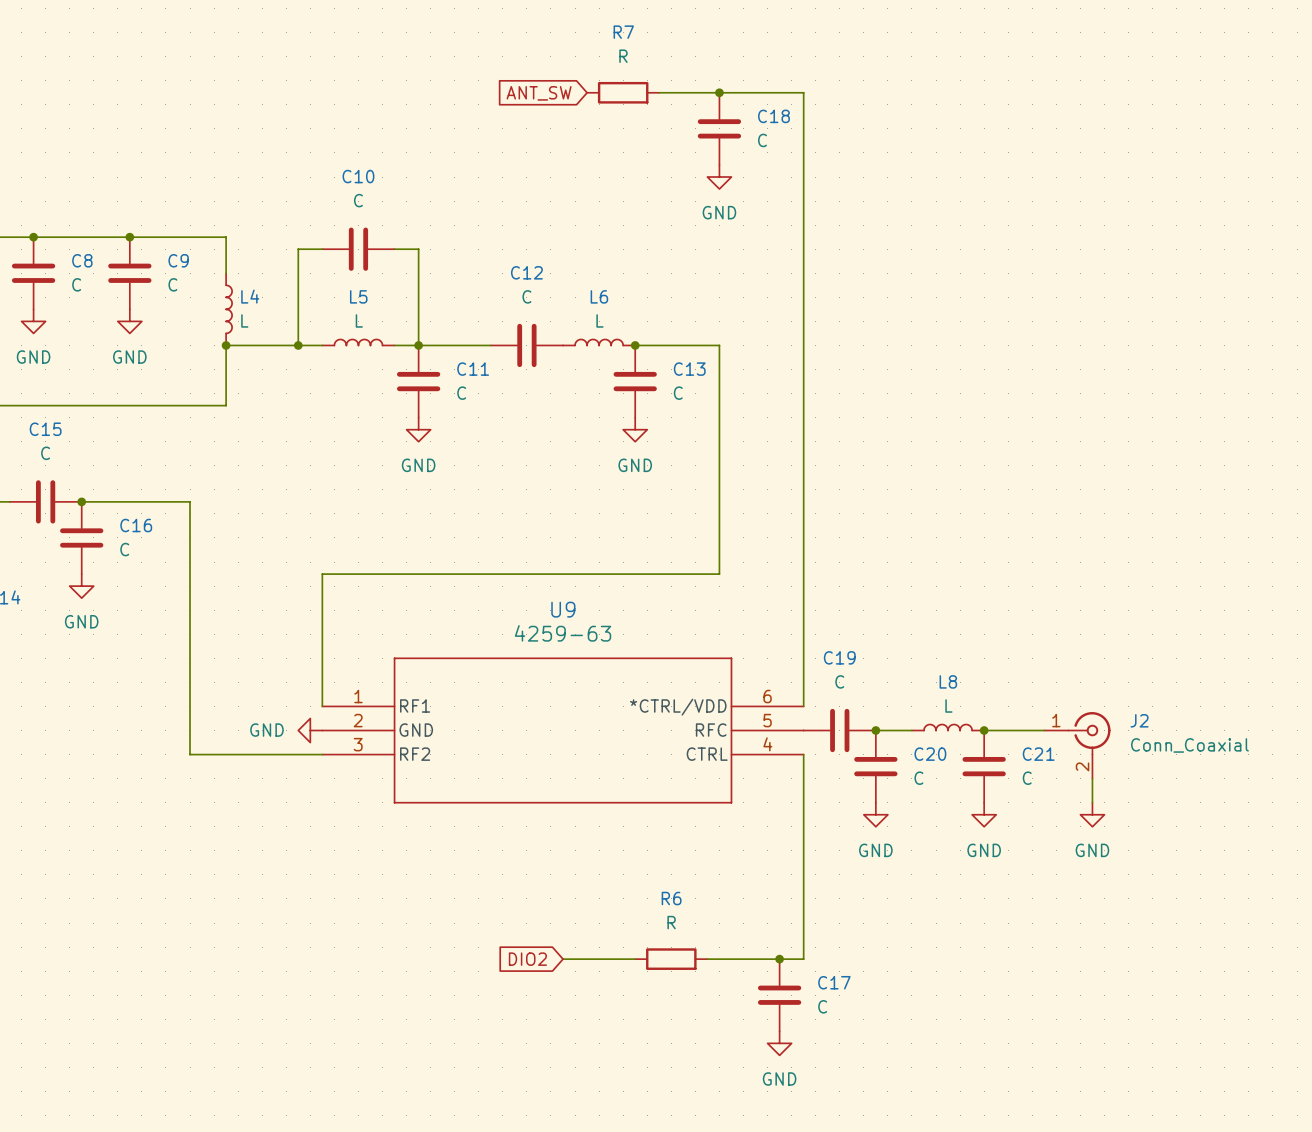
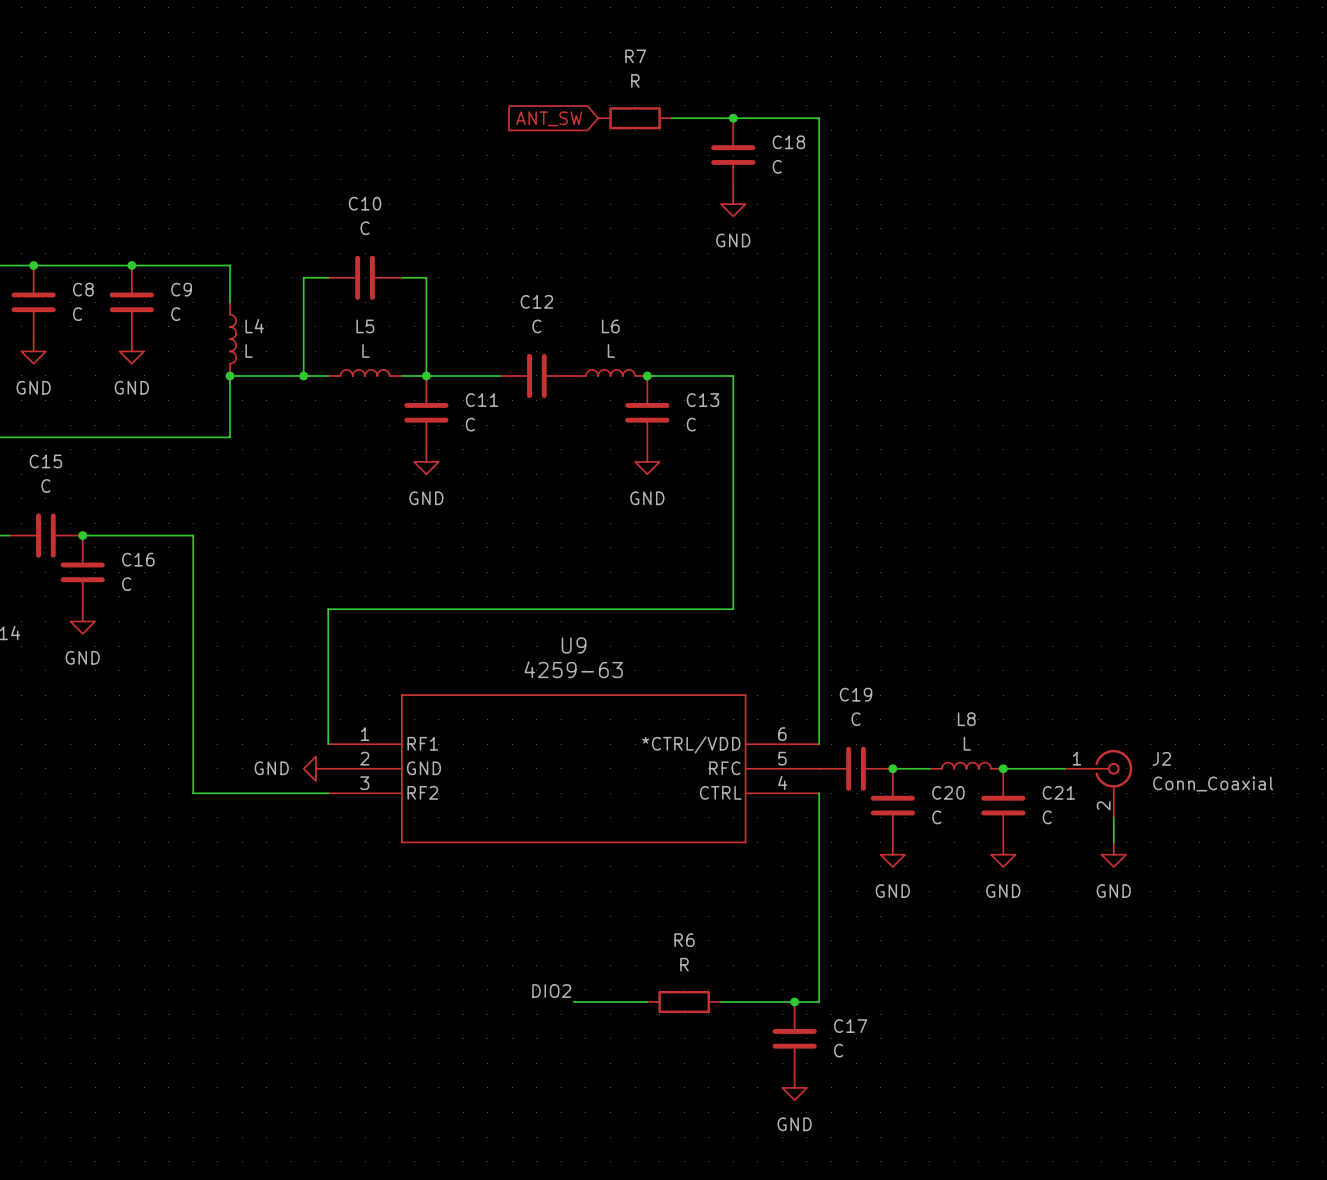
label: none -> DIO2 (551, 991)
global label: DIO2 (527, 959) -> none

